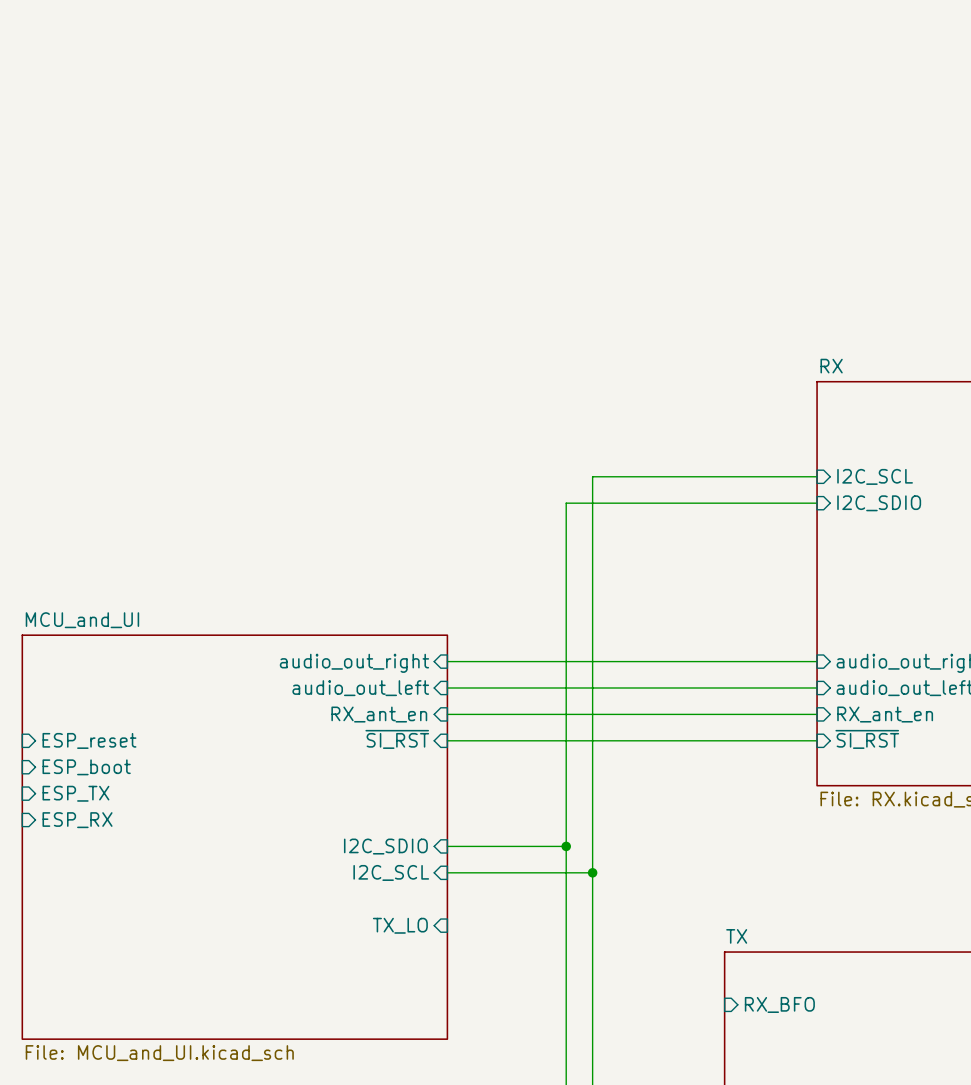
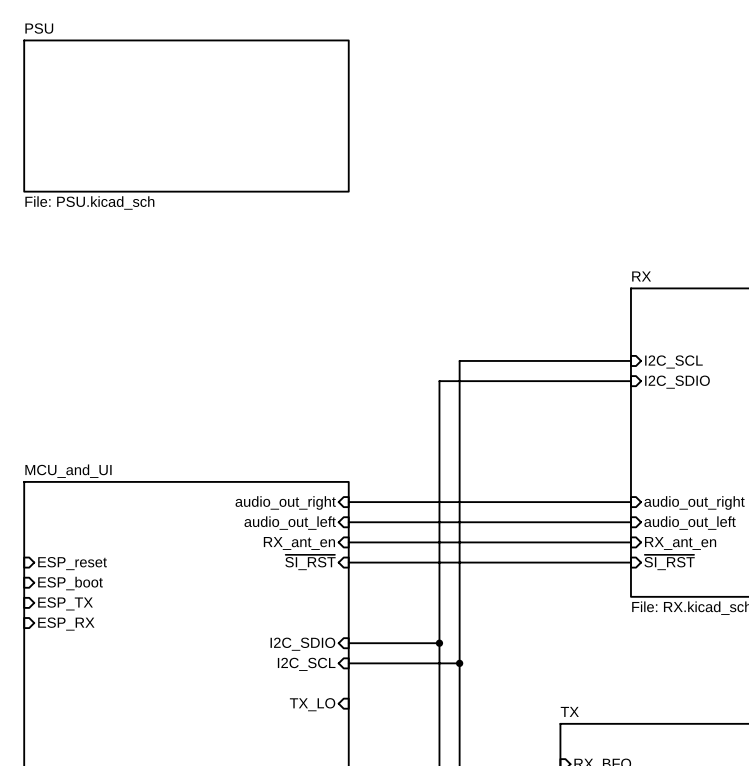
sheet PSU: none -> File: PSU.kicad_sch (186, 116)

